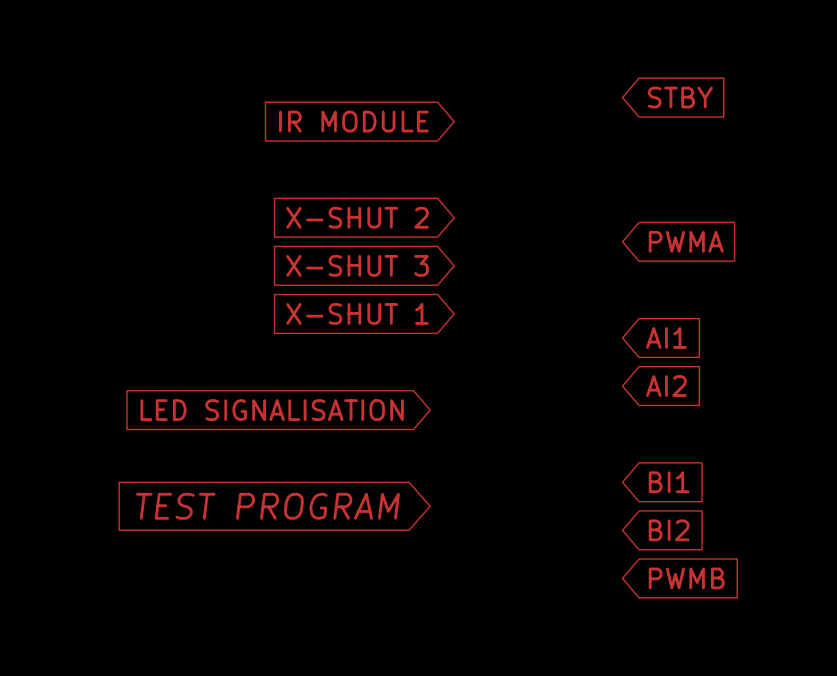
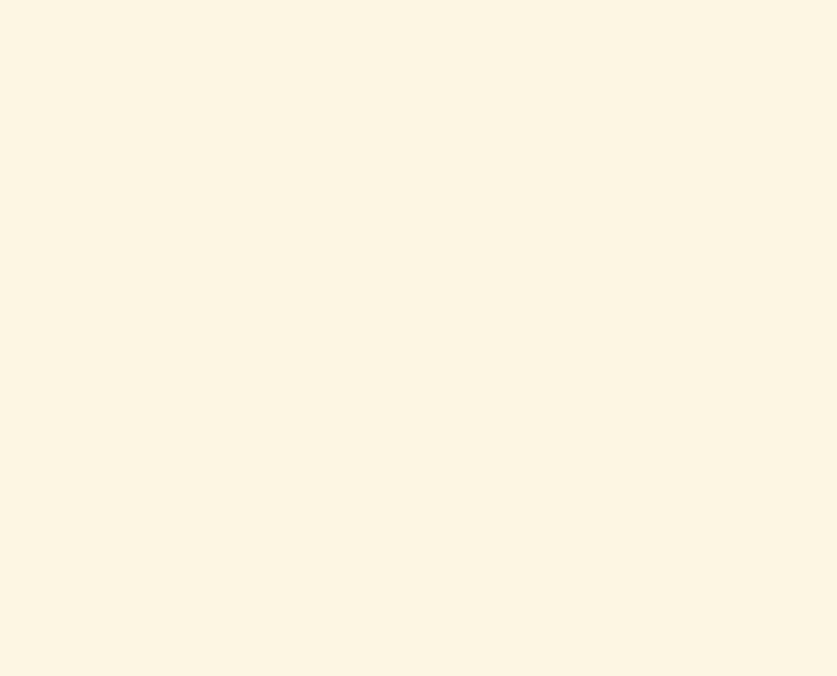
global label: STBY (680, 97) -> none
global label: IR MODULE (353, 121) -> none
global label: X-SHUT 2 (357, 217) -> none
global label: PWMA (686, 241) -> none
global label: X-SHUT 3 (357, 265) -> none
global label: X-SHUT 1 (357, 313) -> none
global label: AI1 (666, 337) -> none
global label: AI2 (666, 386) -> none
global label: LED SIGNALISATION (272, 410) -> none
global label: BI1 (669, 482) -> none
global label: TEST PROGRAM (267, 506) -> none
global label: BI2 (669, 530) -> none
global label: PWMB (686, 578) -> none

